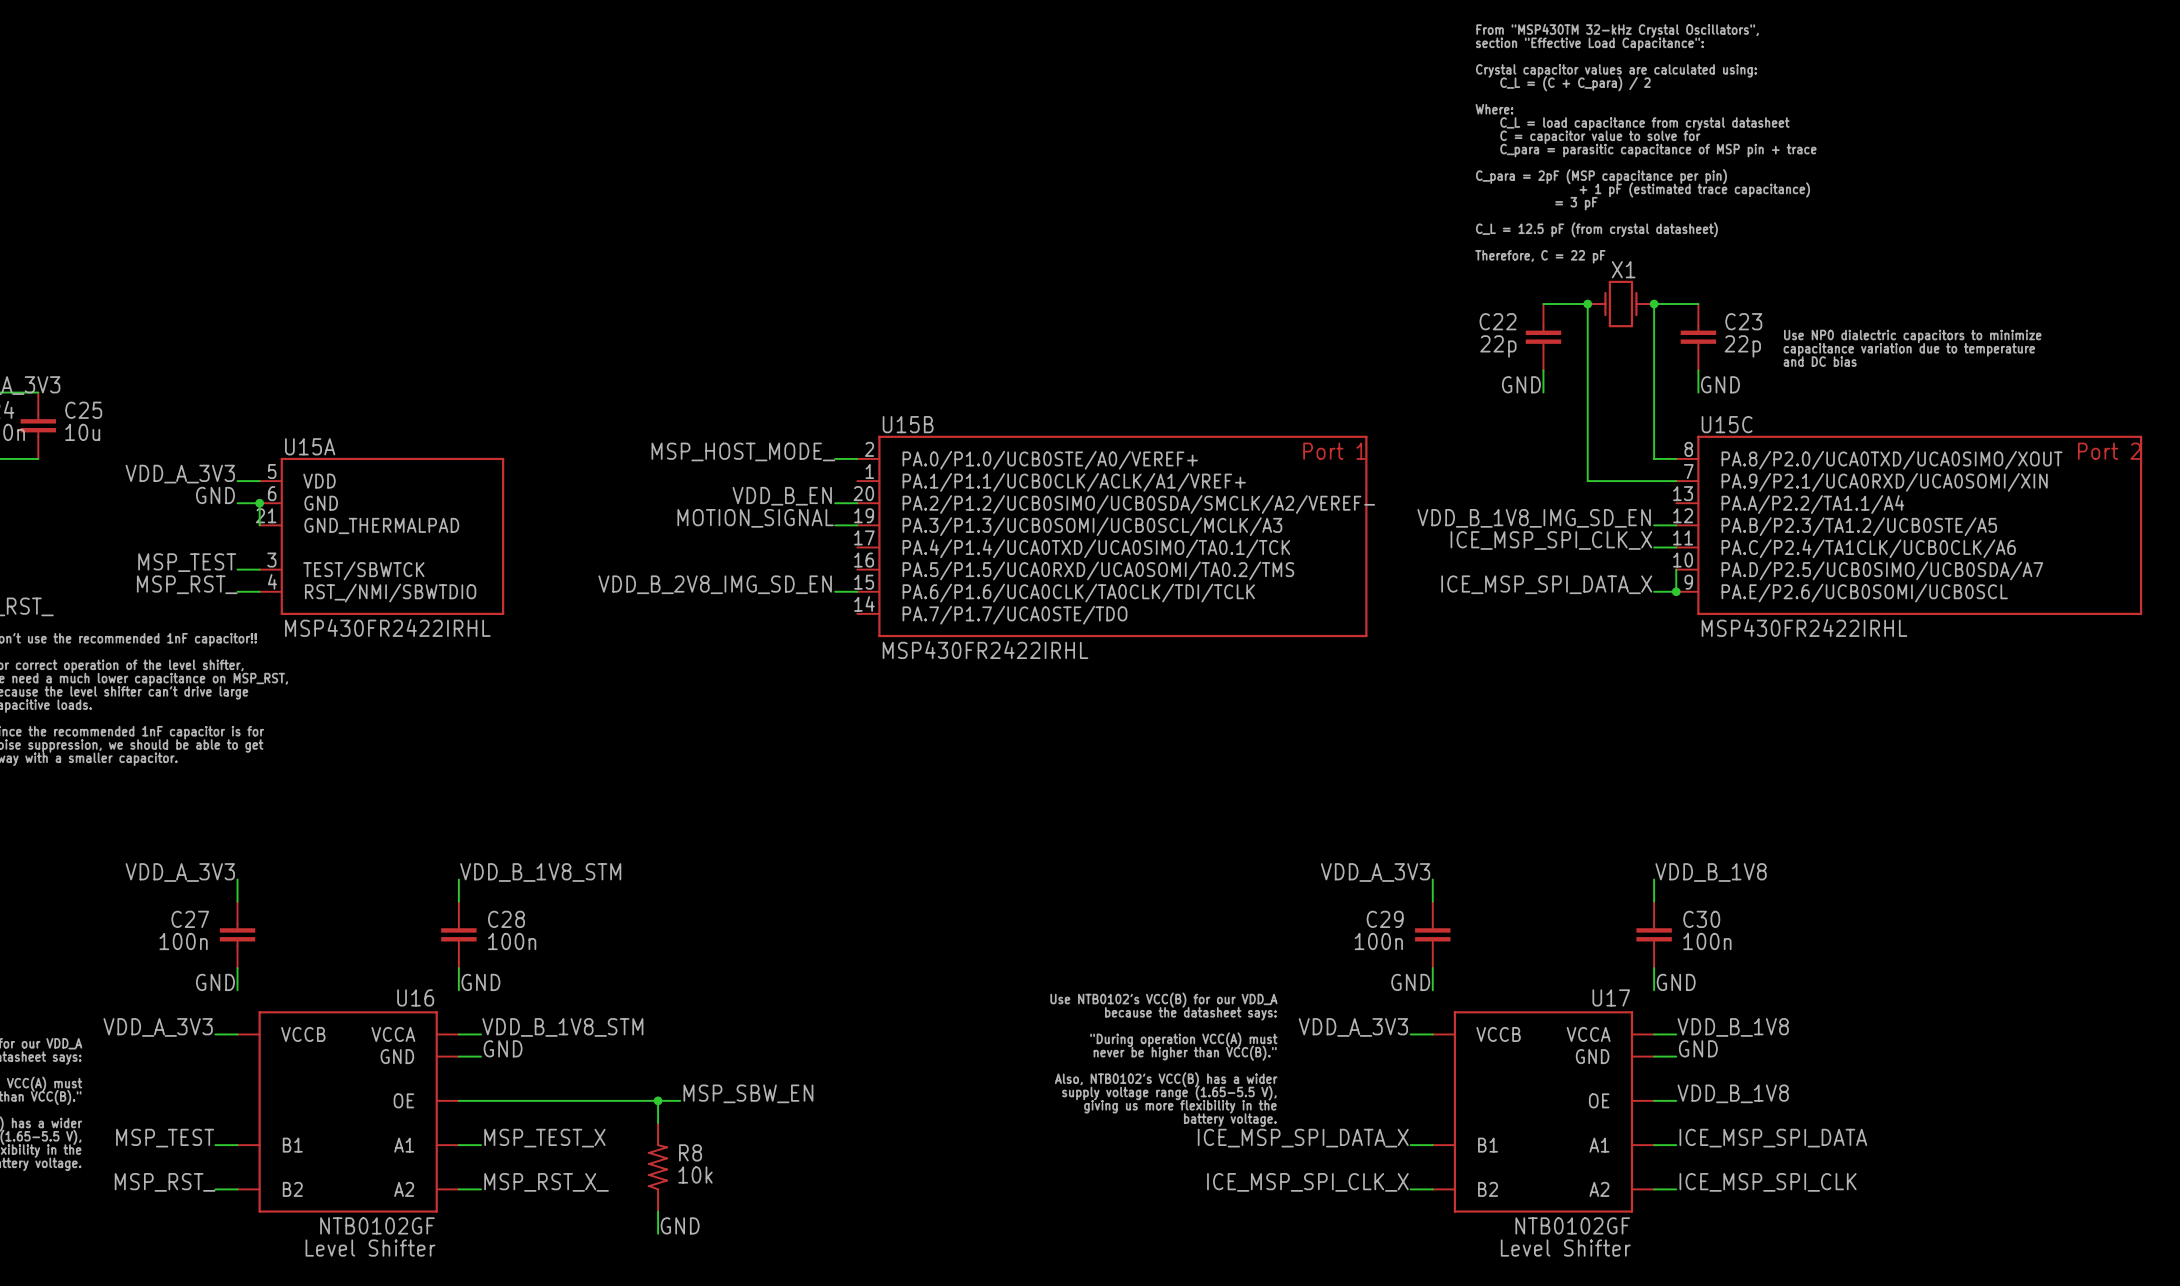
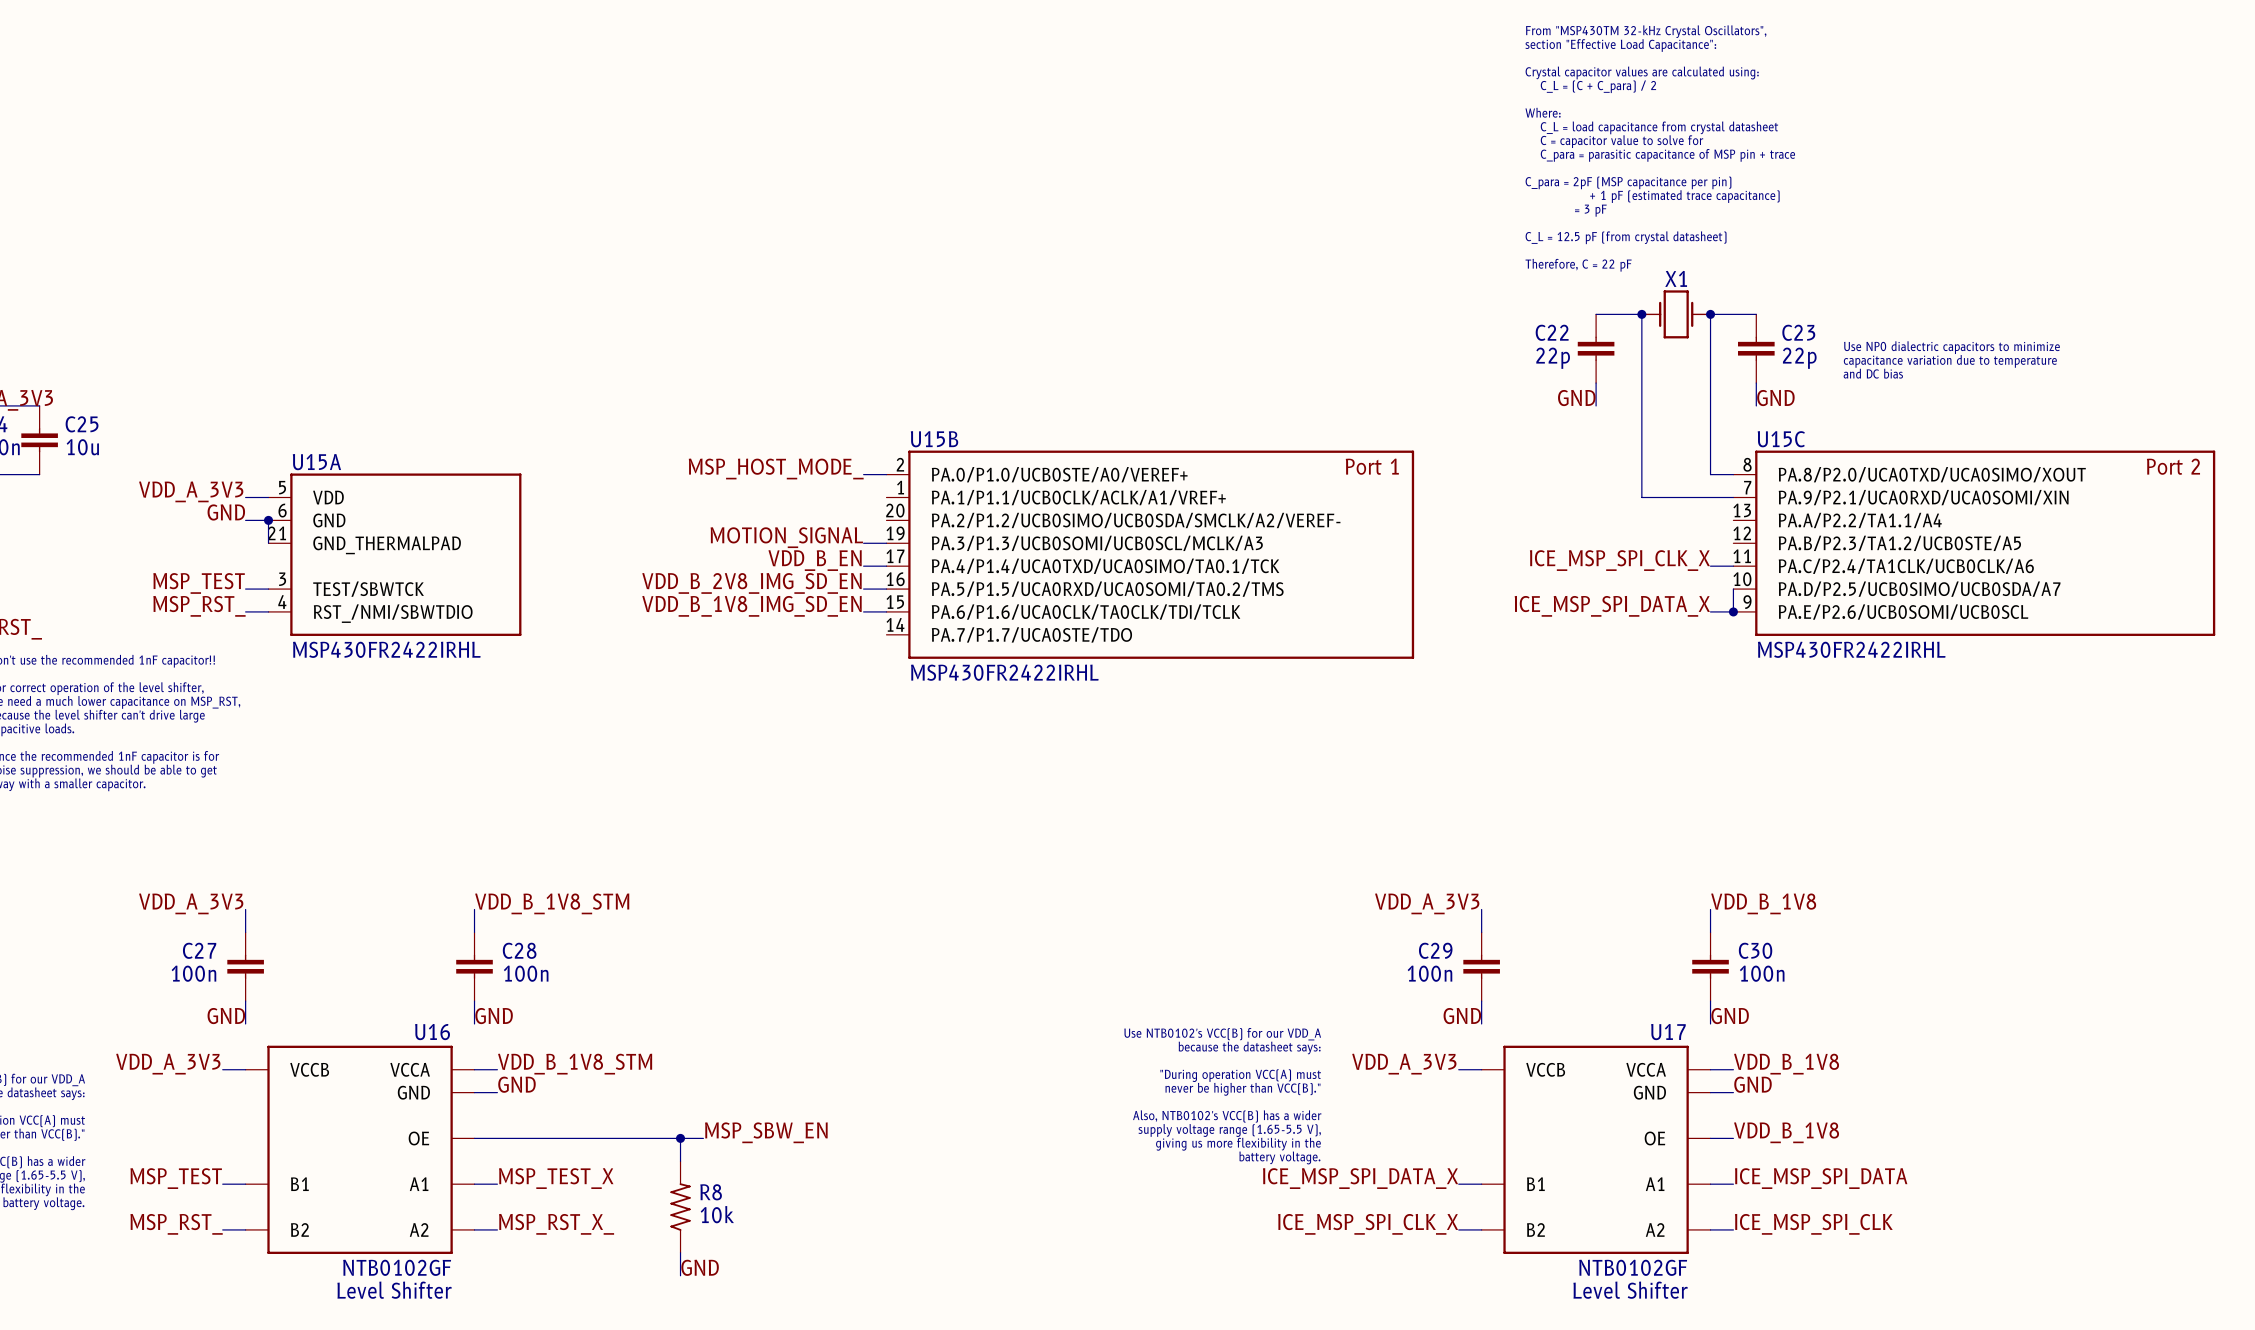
label position: VDD_B_EN (782, 496) -> VDD_B_EN (815, 560)
wire: (835, 503) (857, 503) -> (863, 566) (886, 566)
label: VDD_B_1V8_IMG_SD_EN (1534, 518) -> none
wire: (1654, 525) (1676, 525) -> none
label: none -> VDD_B_2V8_IMG_SD_EN (751, 583)
wire: none -> (863, 589) (886, 589)
label: VDD_B_2V8_IMG_SD_EN (715, 584) -> VDD_B_1V8_IMG_SD_EN (751, 606)

